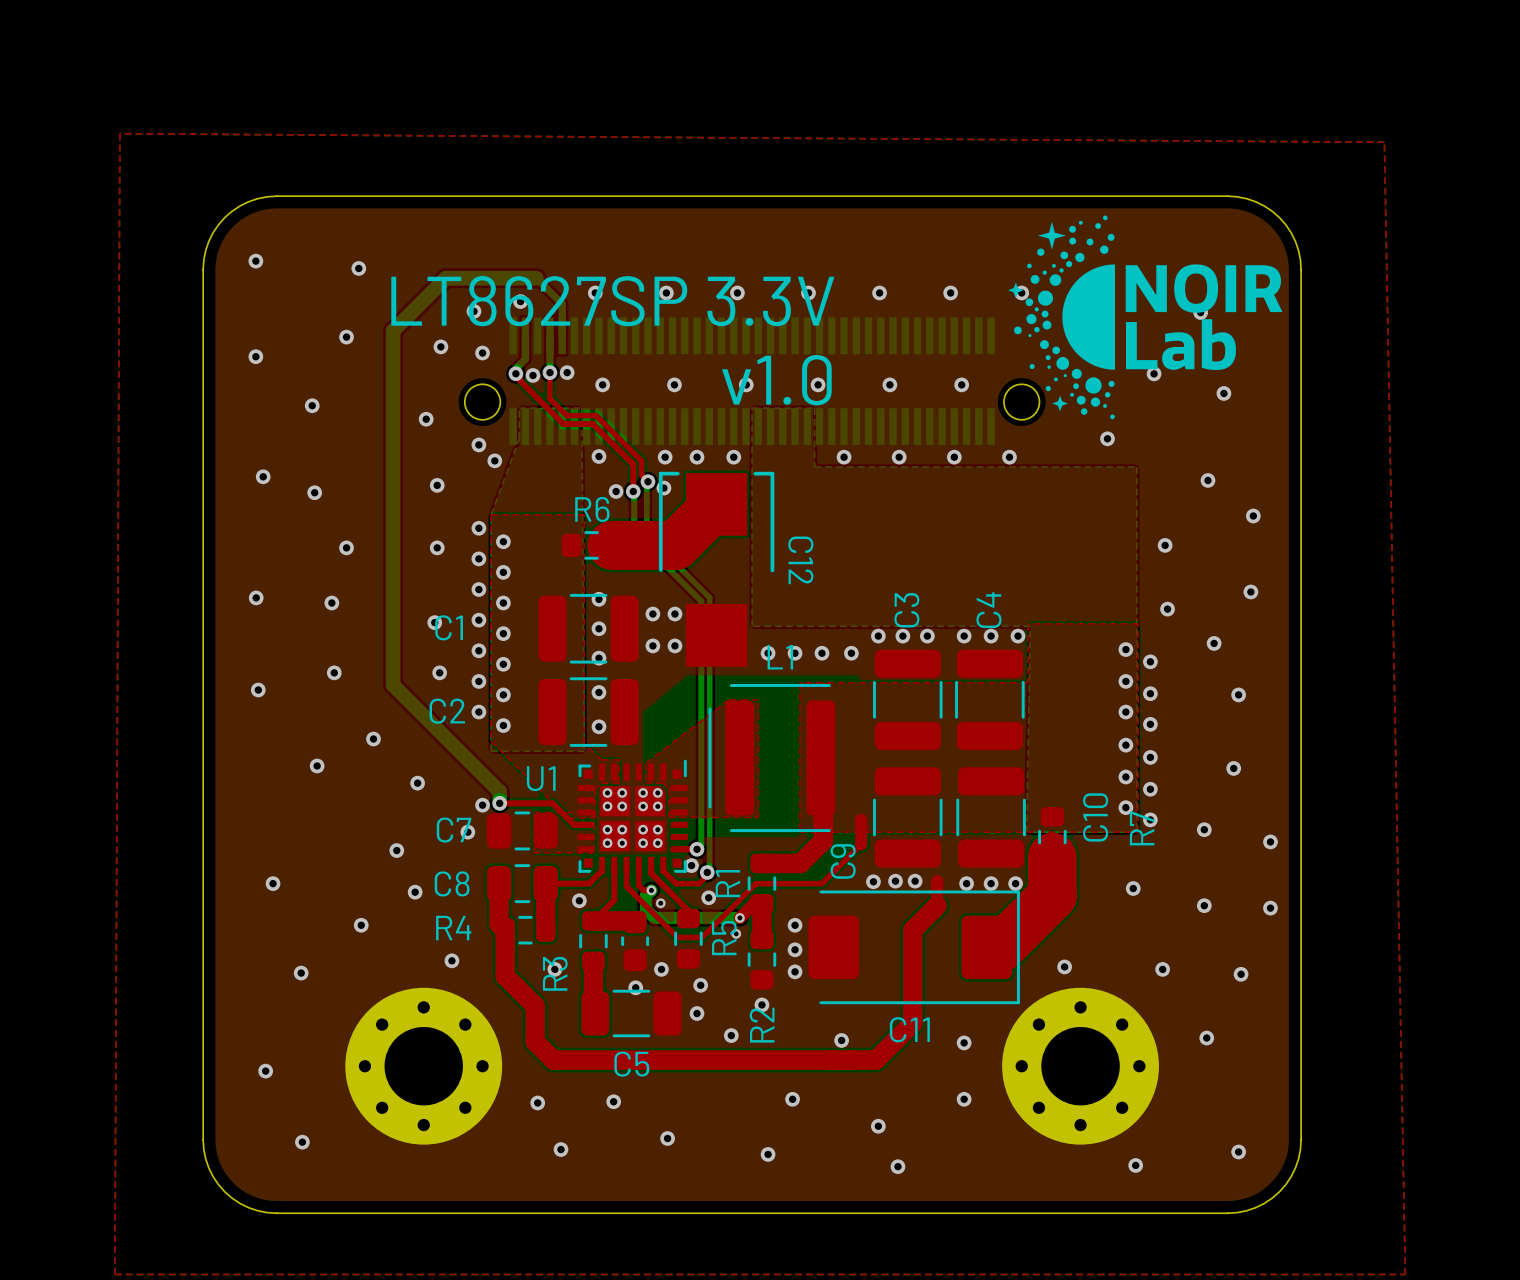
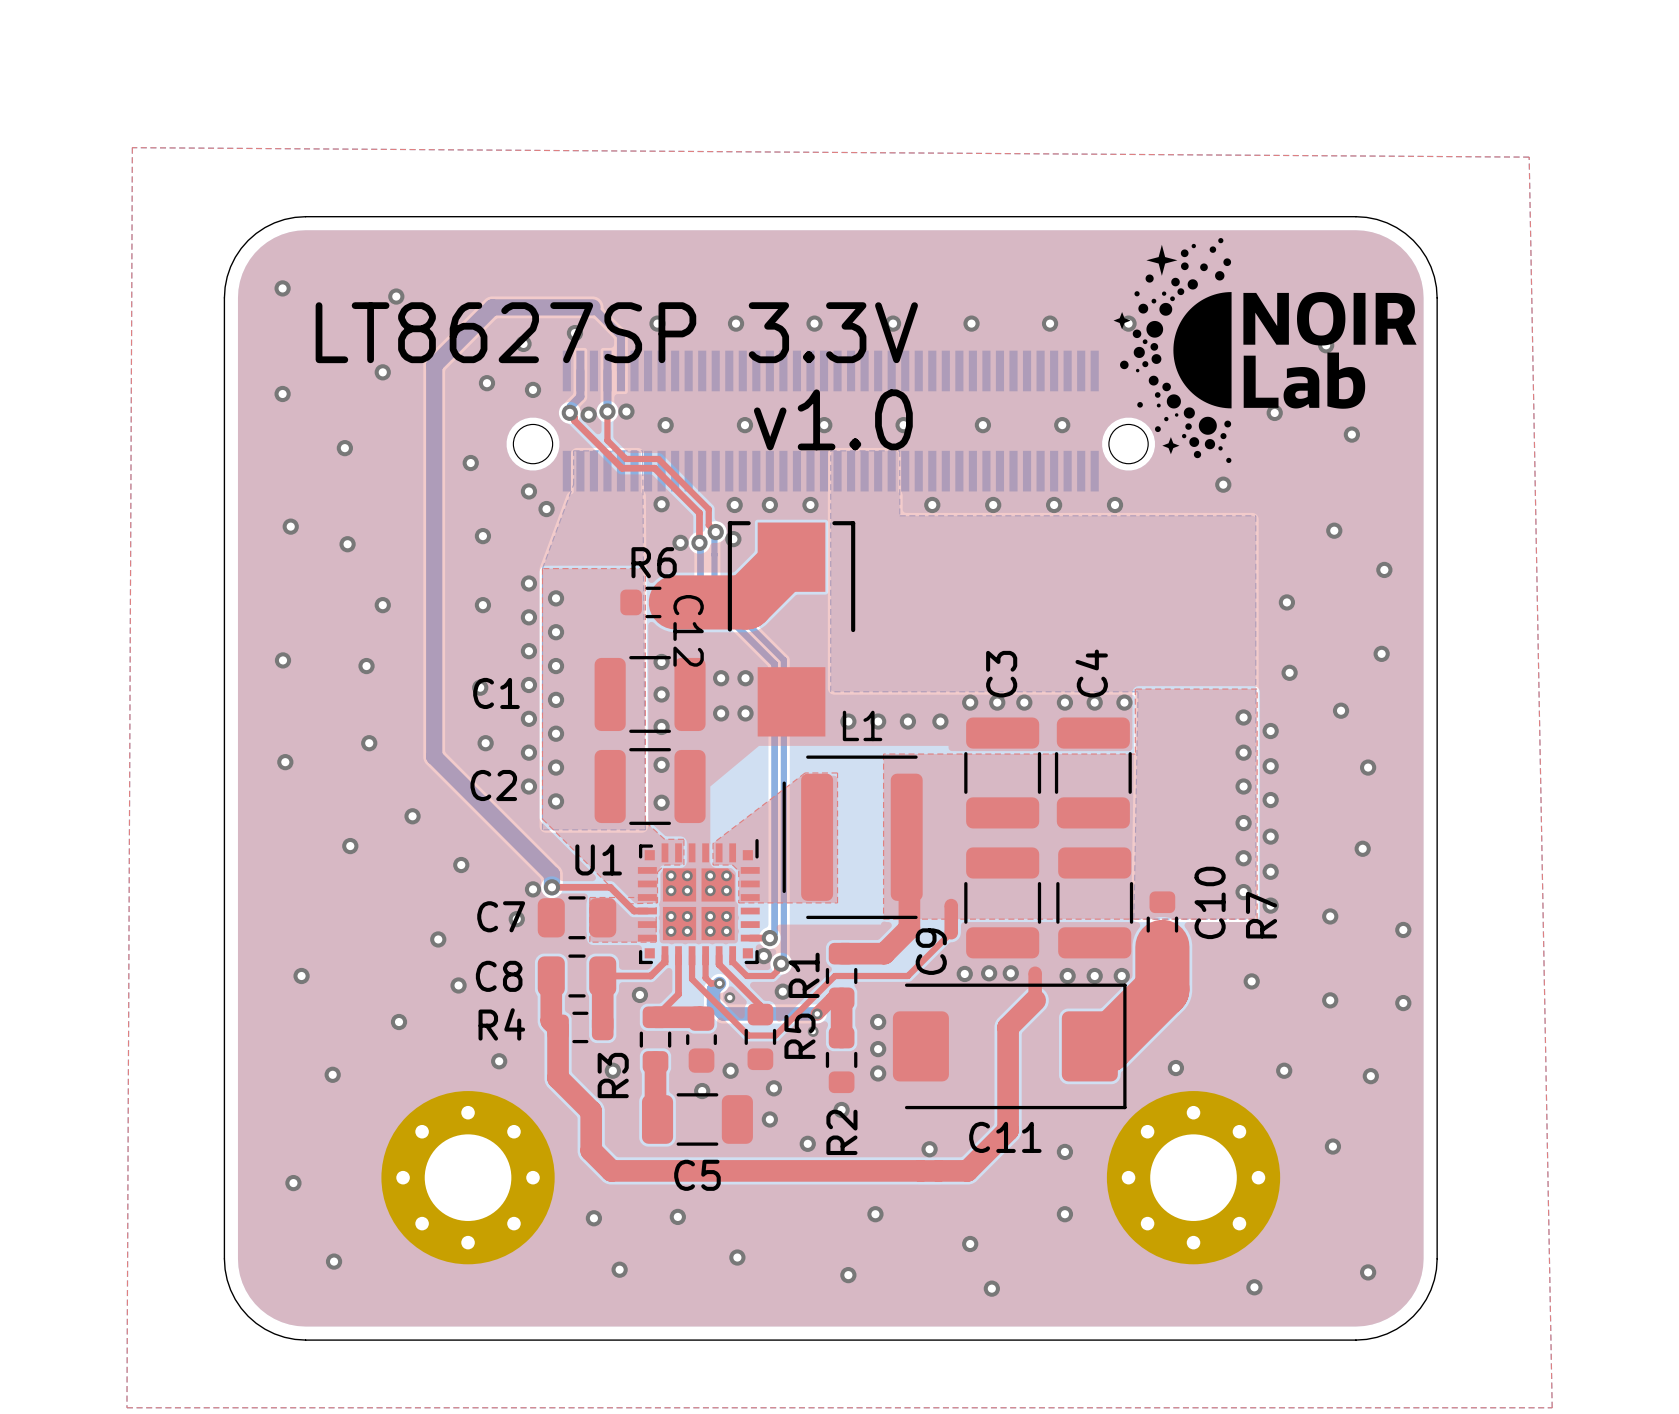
C12 name position: C12 (800, 560) -> C12 (688, 630)

